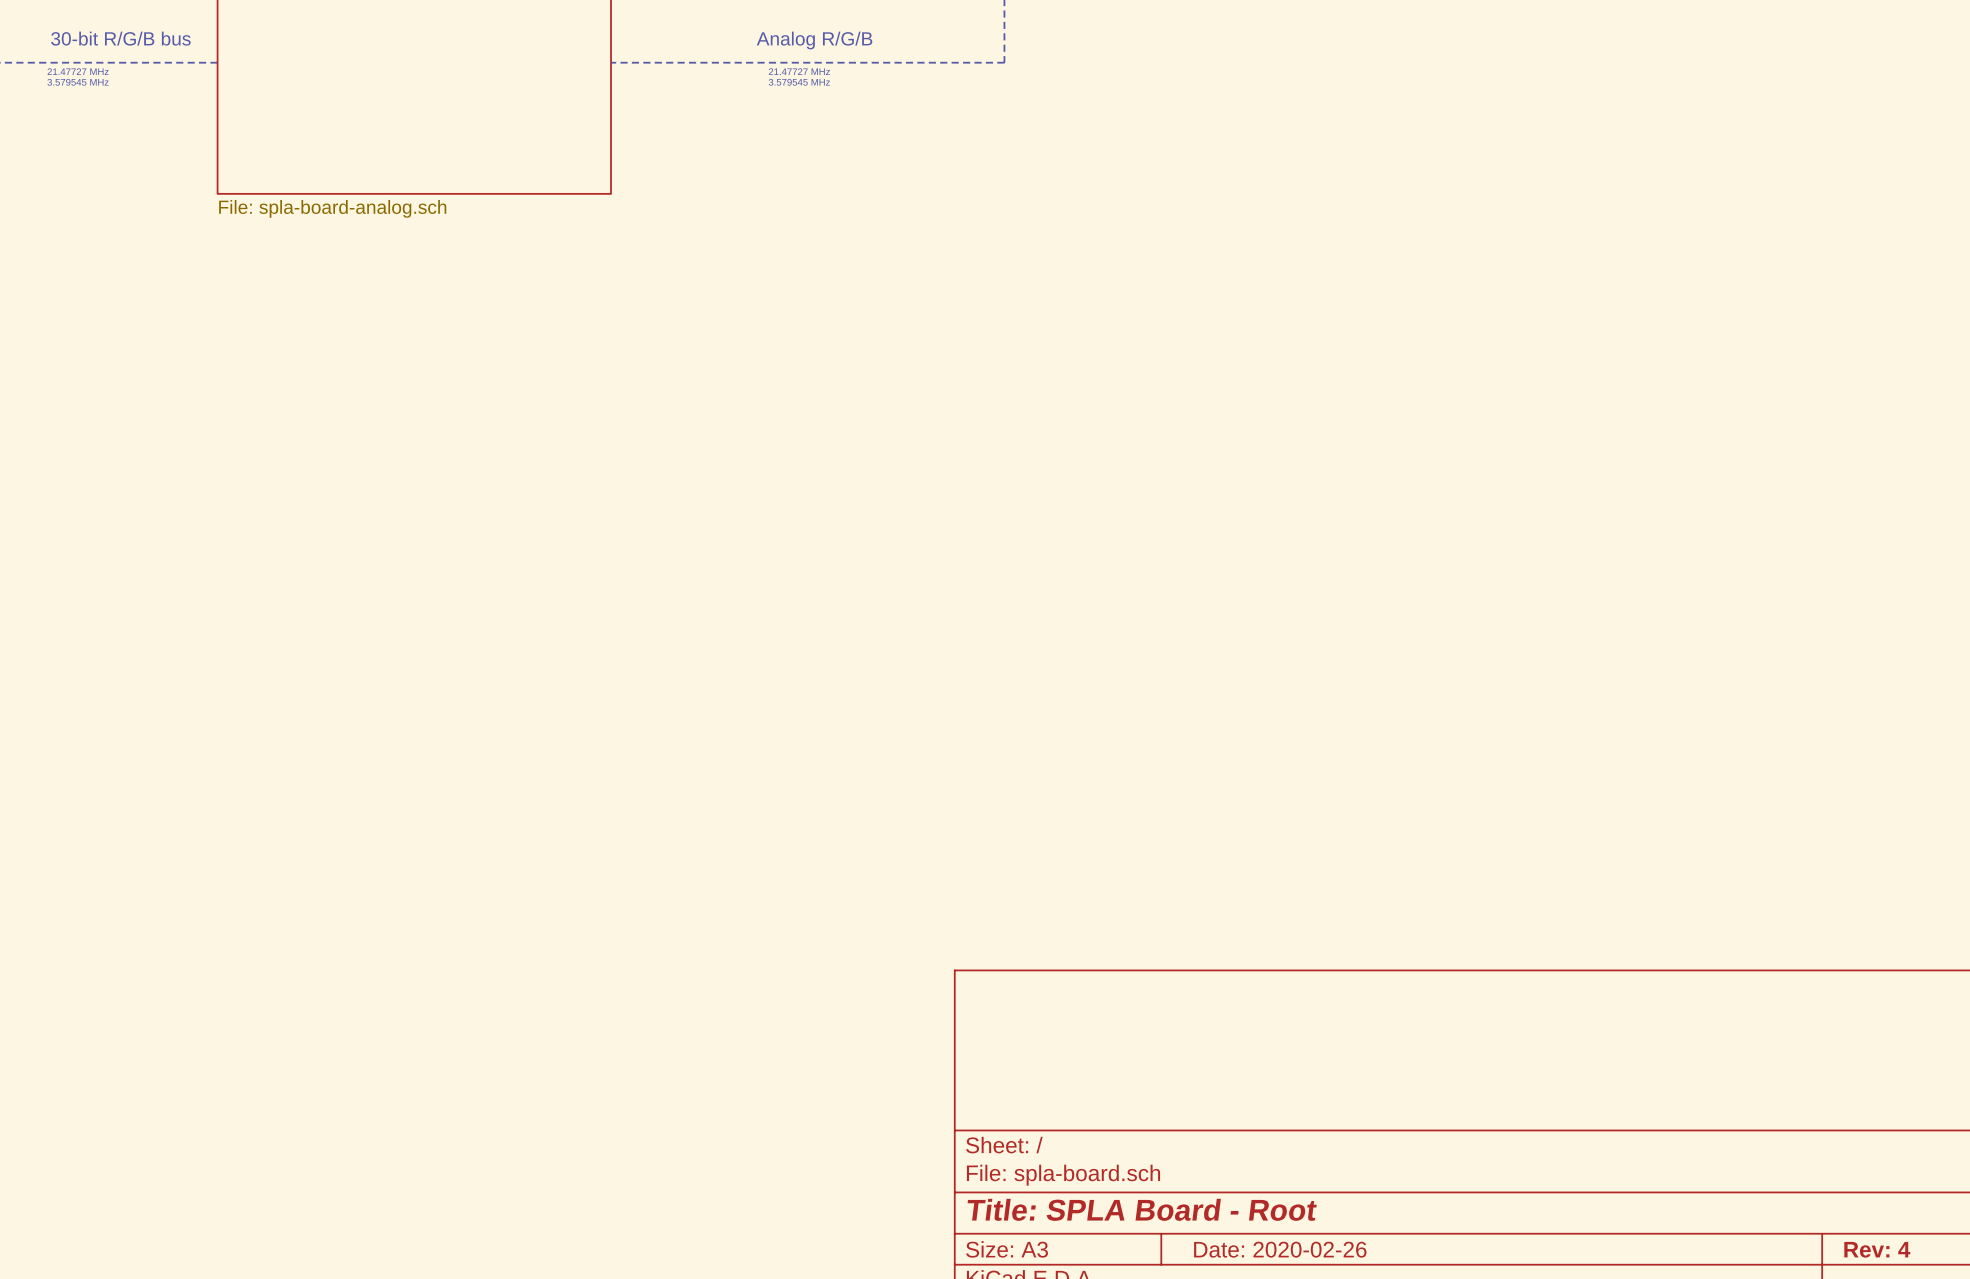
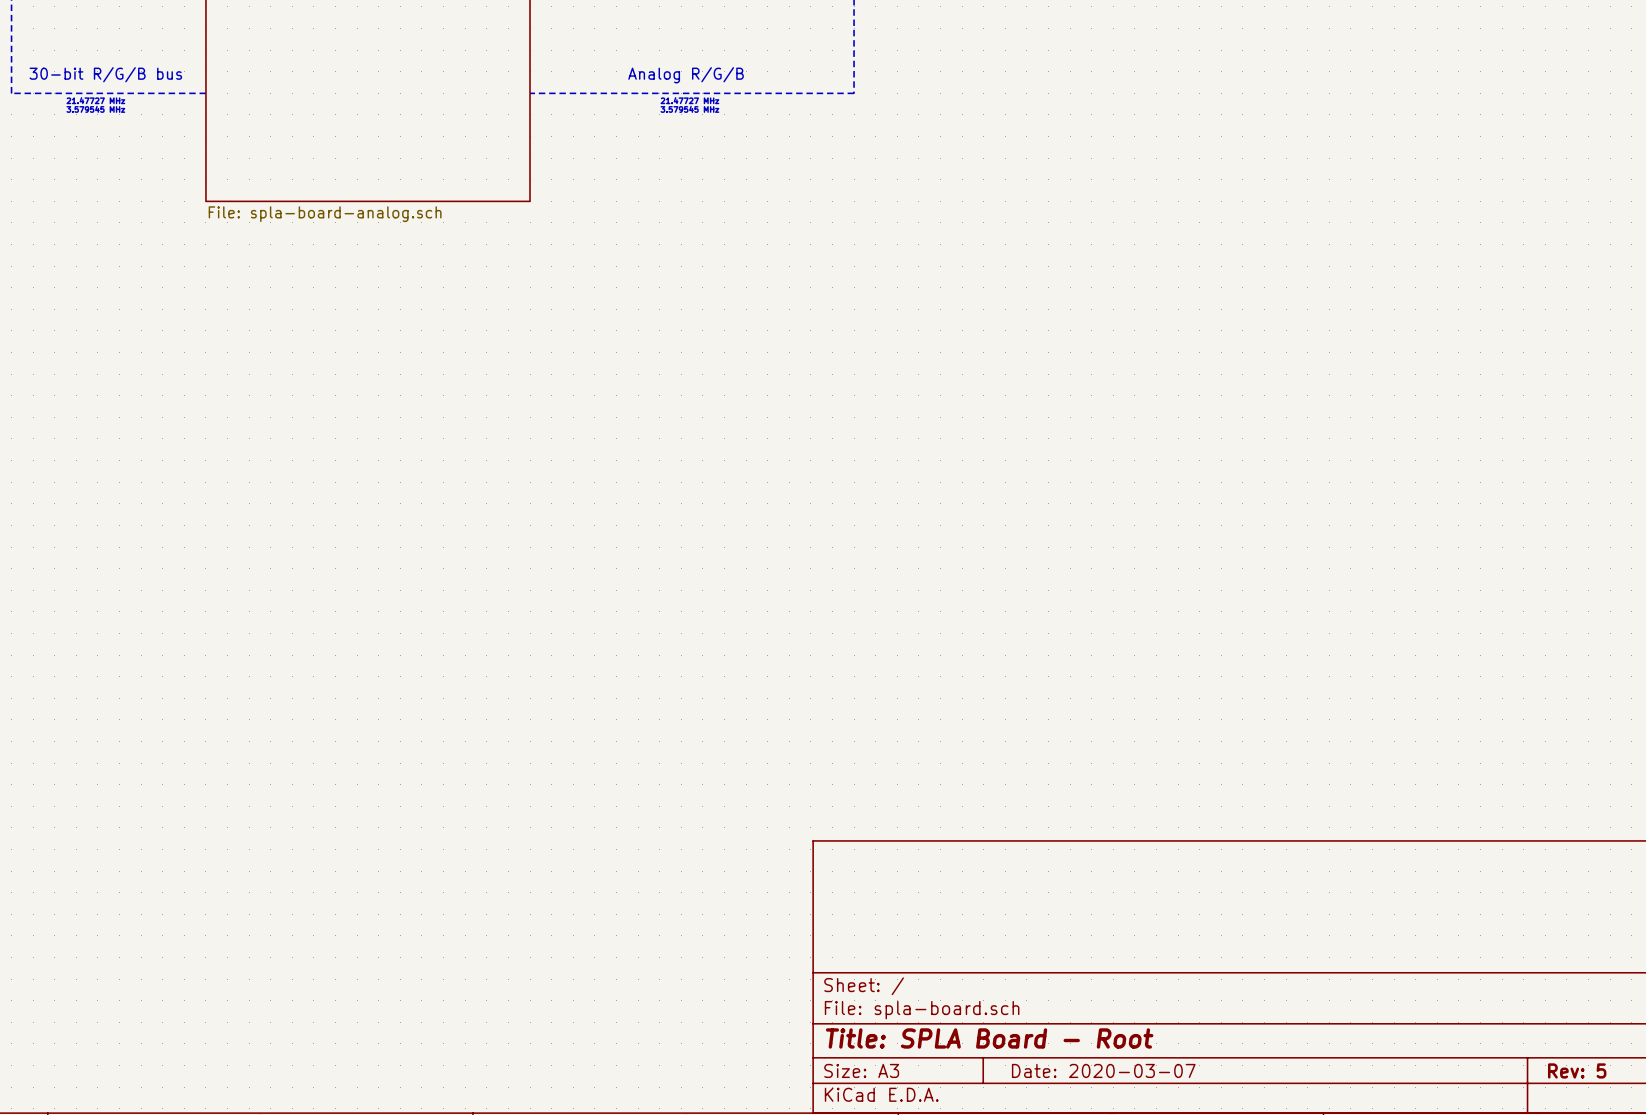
title block: Date: 2020-02-26 (1280, 1249) -> Date: 2020-03-07 (1103, 1070)
title block: Rev: 4 (1877, 1249) -> Rev: 5 (1577, 1070)

